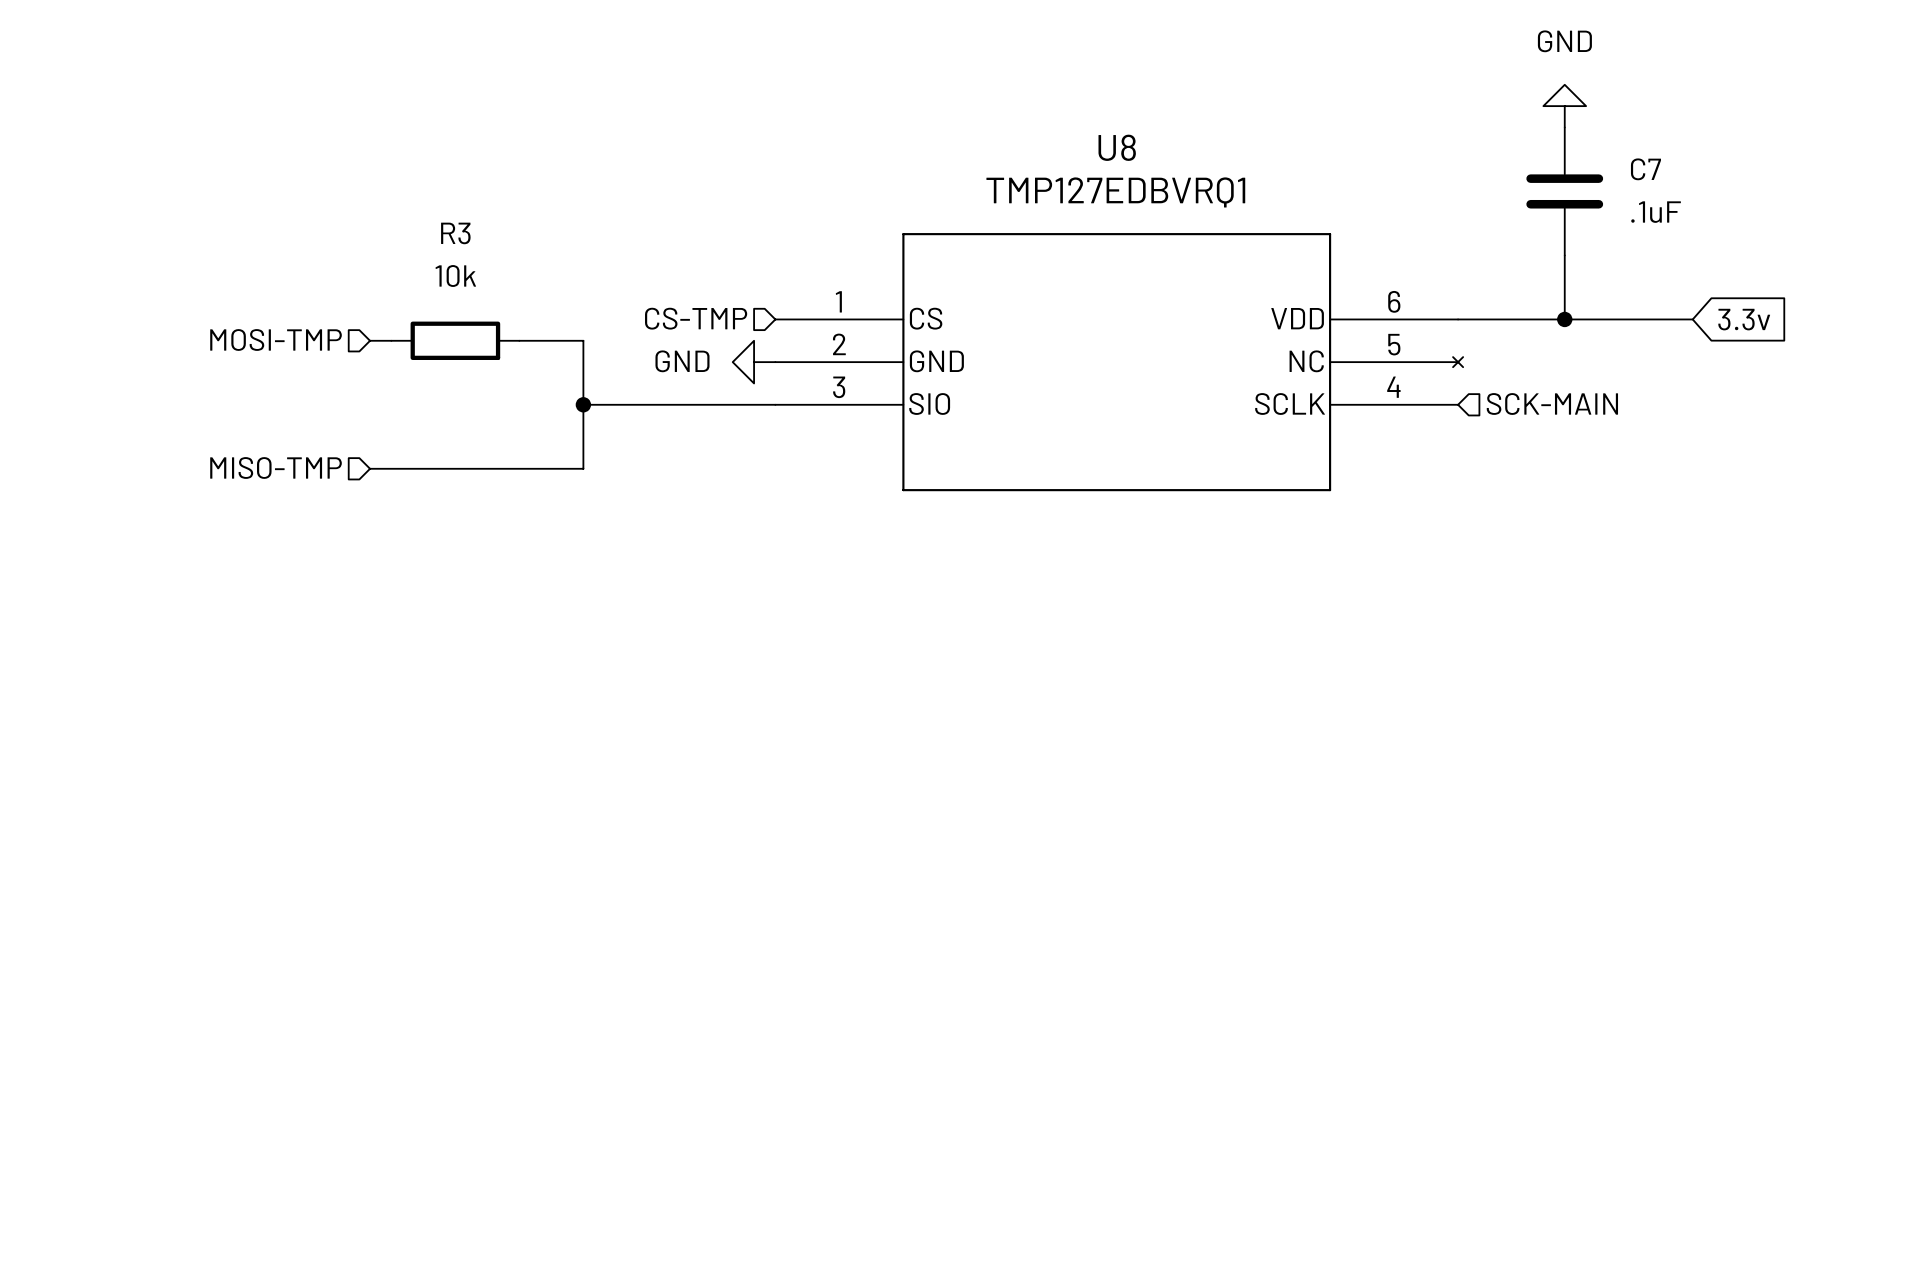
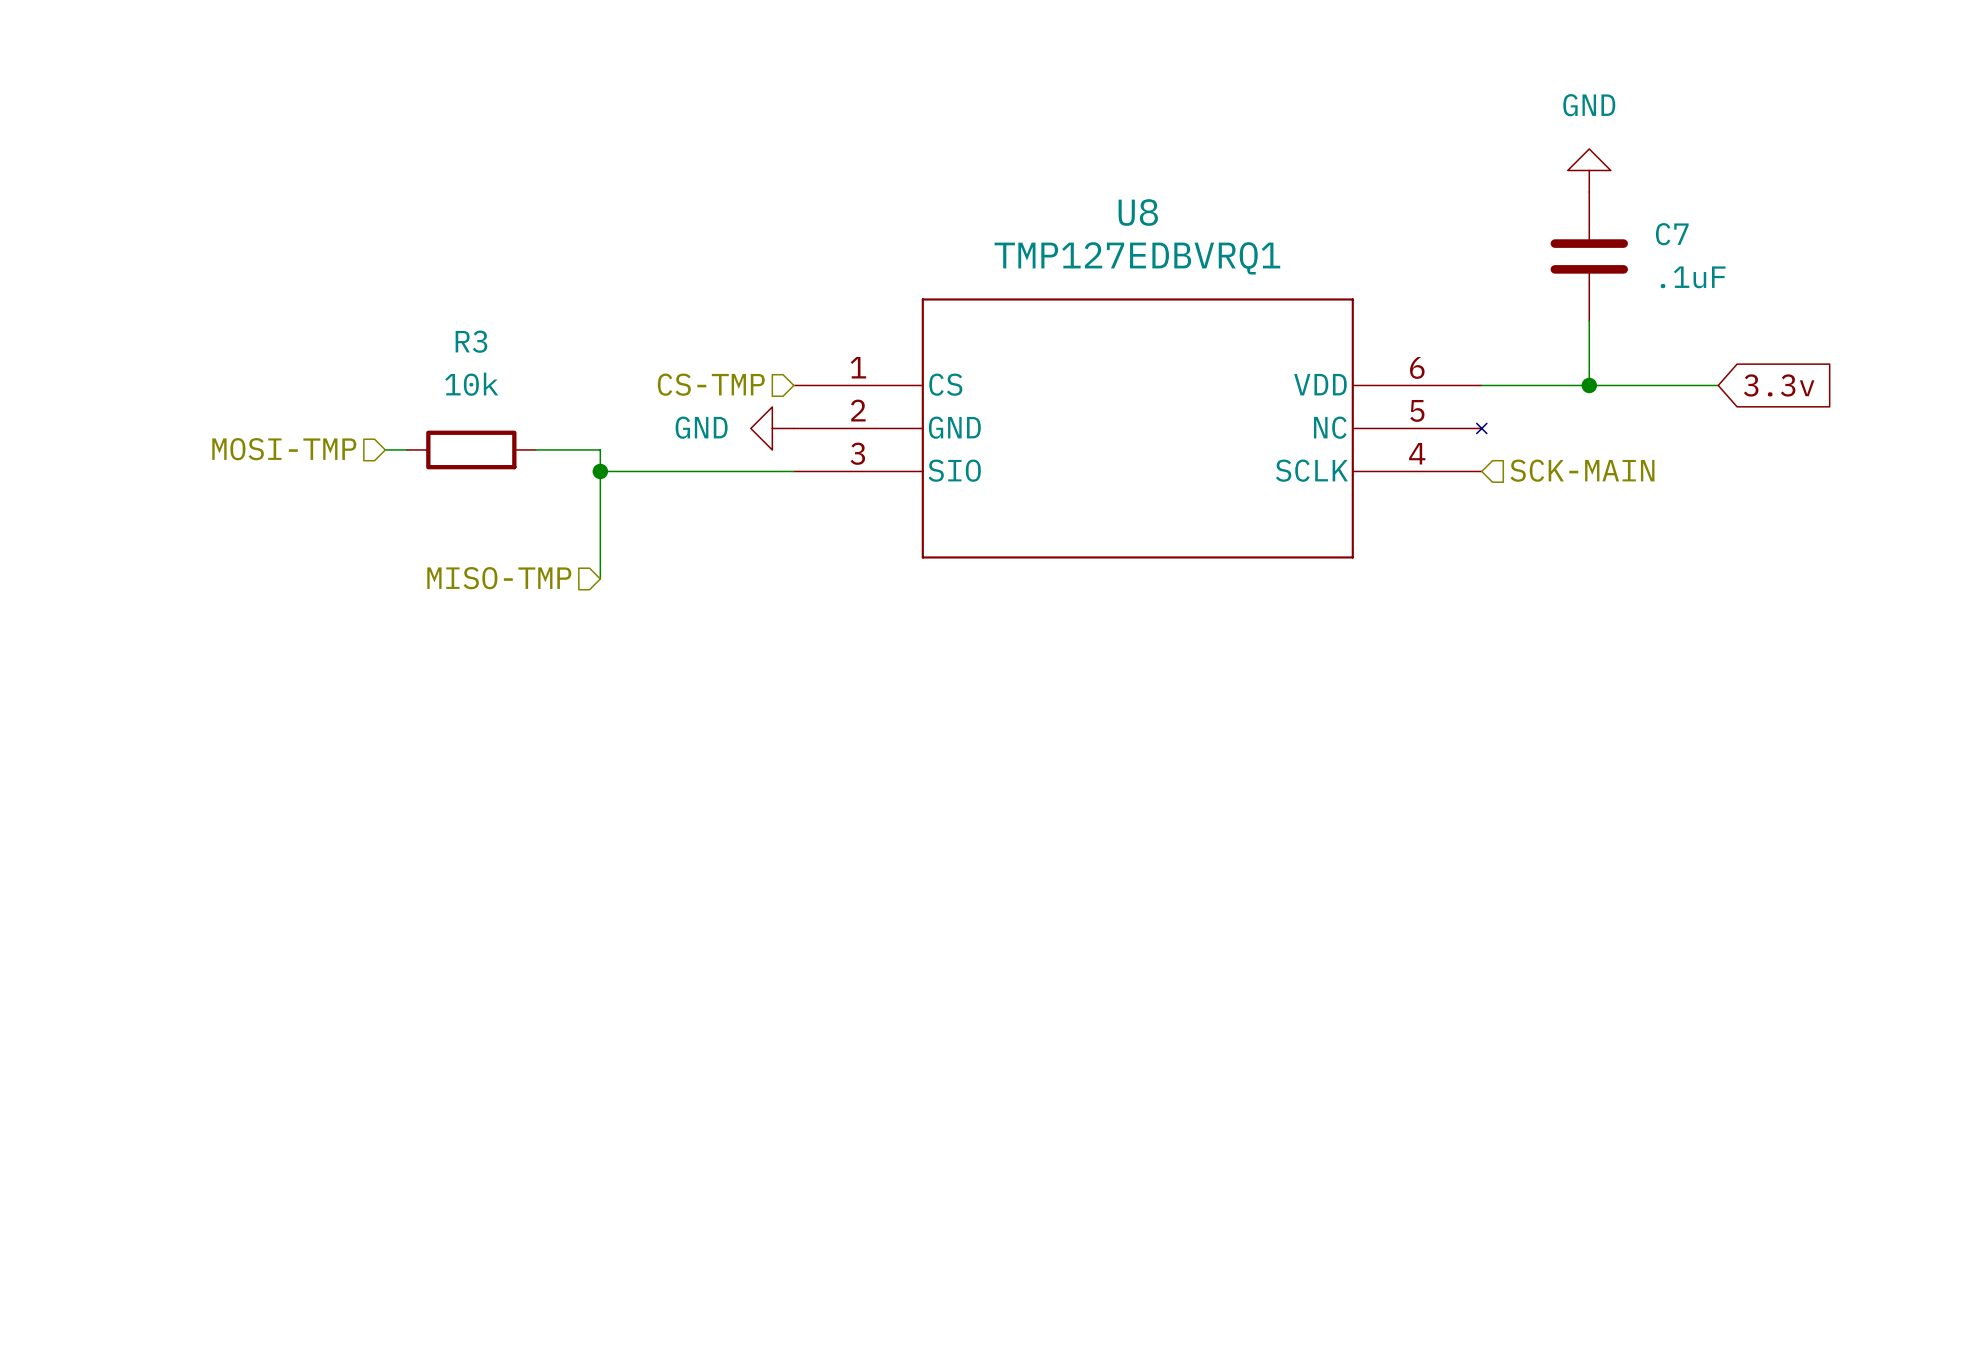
hierarchical label position: MOSI-TMP (276, 339) -> MOSI-TMP (284, 449)
wire: (370, 340) (391, 340) -> (385, 449) (406, 449)
R3 position: (455, 340) -> (471, 449)
wire: (519, 340) (583, 340) (583, 383) -> (535, 449) (600, 449)
hierarchical label position: MISO-TMP (276, 467) -> MISO-TMP (499, 578)
wire: (370, 468) (583, 468) -> (600, 578) (600, 535)

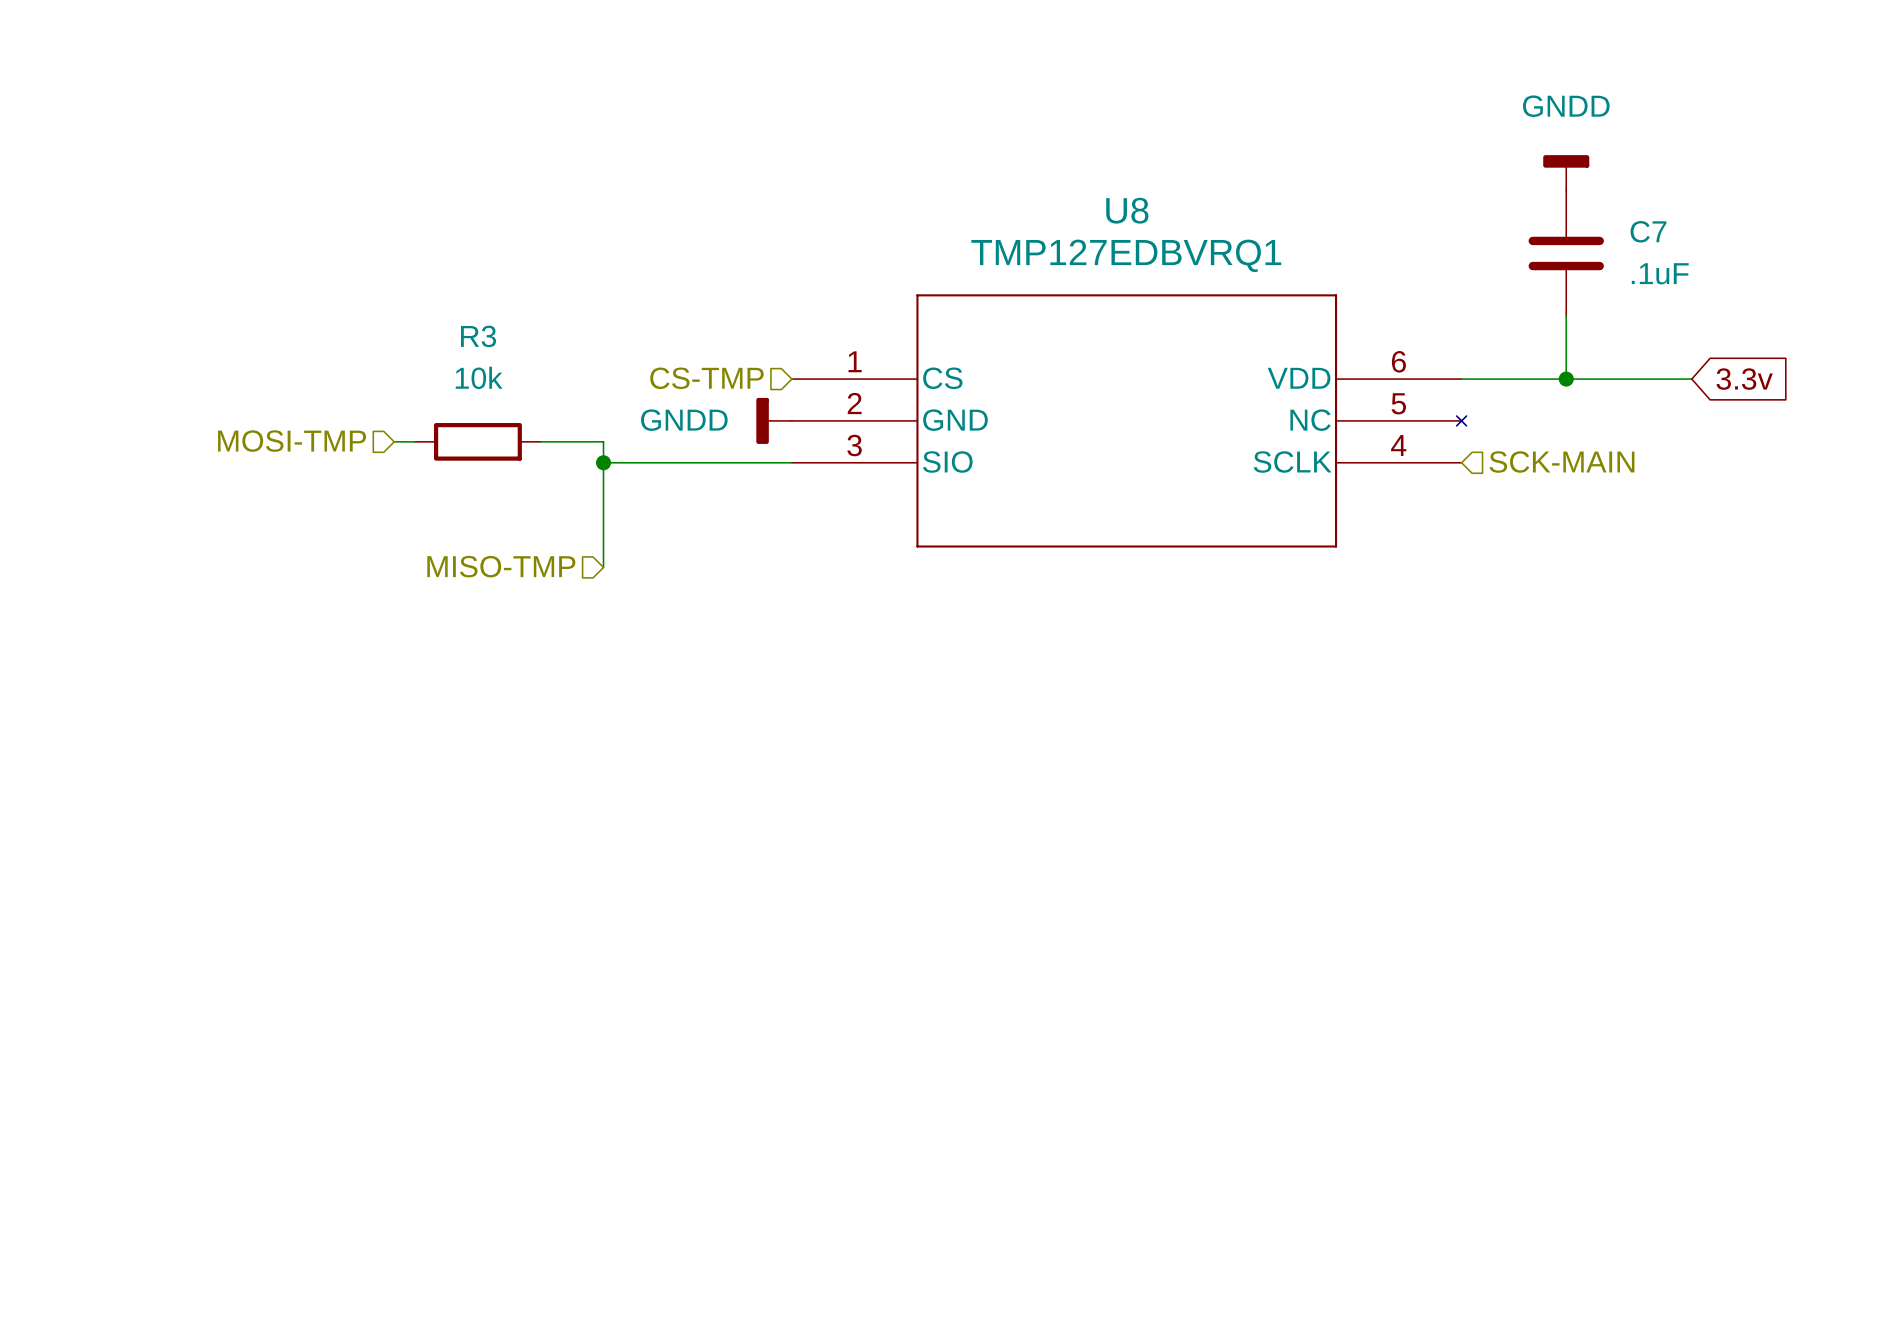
power symbol: GND (1589, 170) -> GNDD (1566, 172)
power symbol: GND (772, 428) -> GNDD (774, 420)

